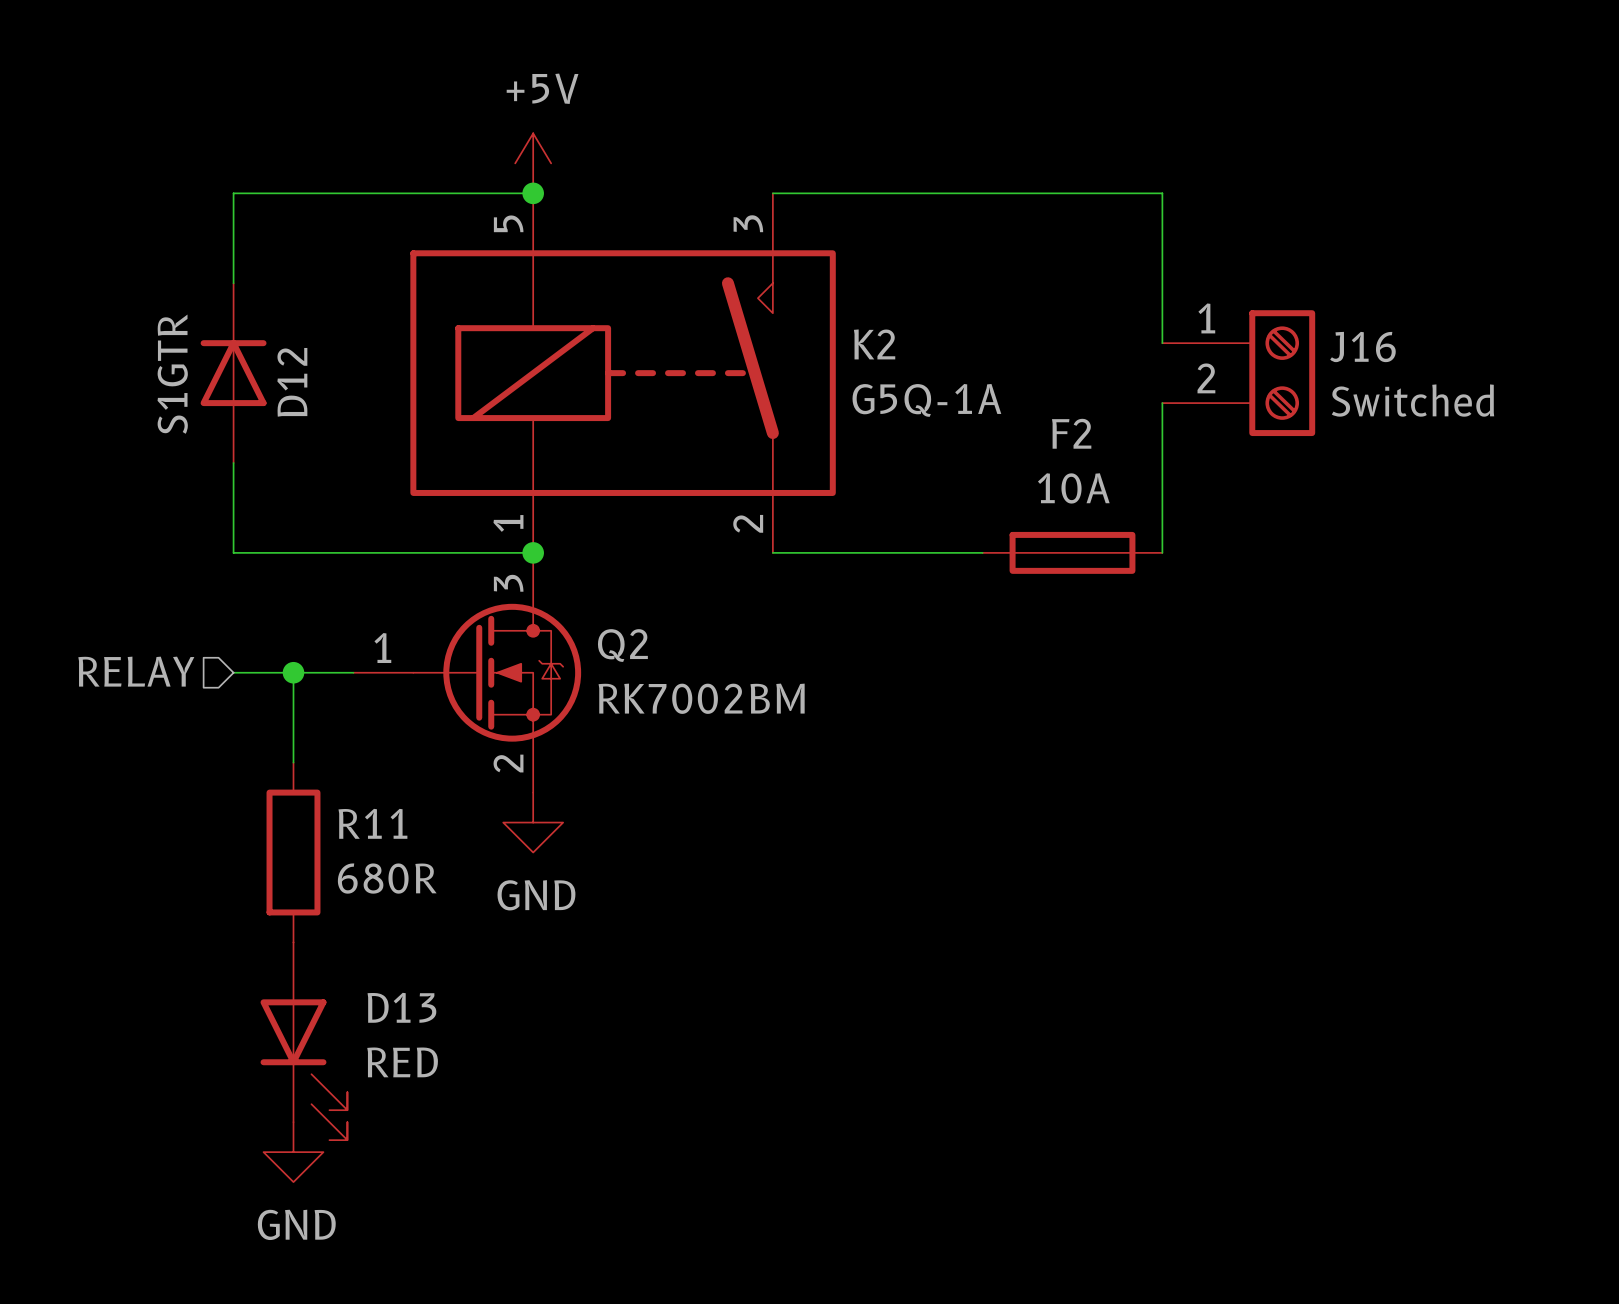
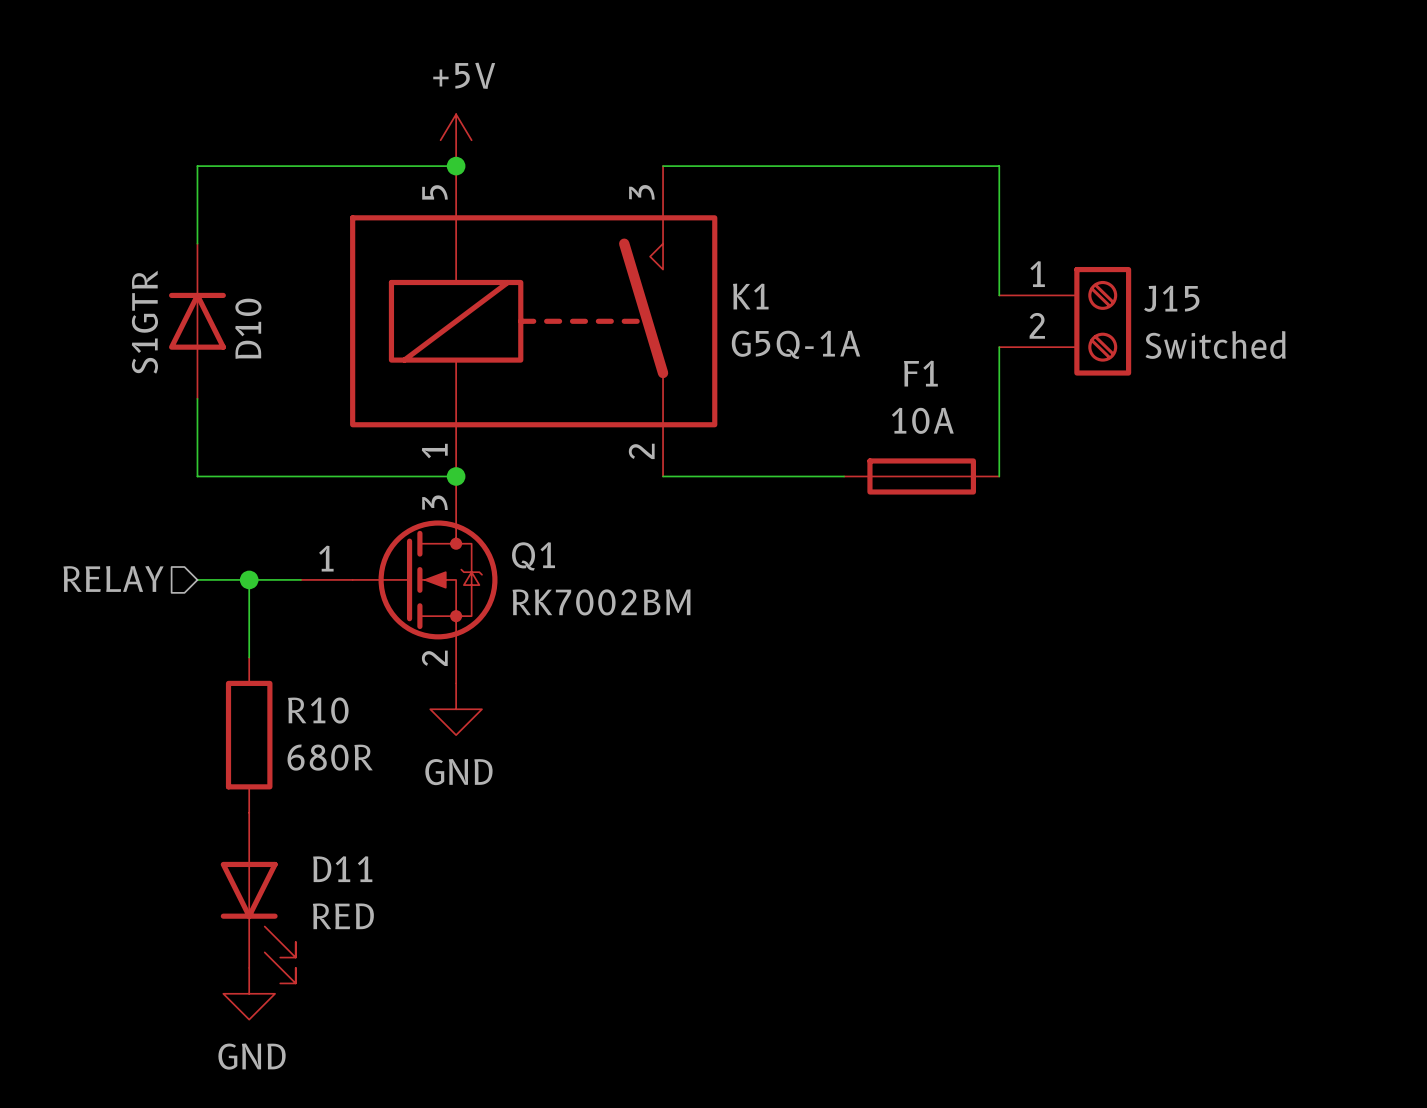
K2 name: K2 (874, 344) -> K1 (750, 296)
J16 name: J16 (1362, 347) -> J15 (1171, 298)
D12 name: D12 (292, 382) -> D10 (248, 328)
F2 name: F2 (1071, 433) -> F1 (920, 373)
Q2 name: Q2 (622, 645) -> Q1 (533, 556)
R11 name: R11 (372, 823) -> R10 (318, 710)
D13 name: D13 (401, 1007) -> D11 (342, 869)

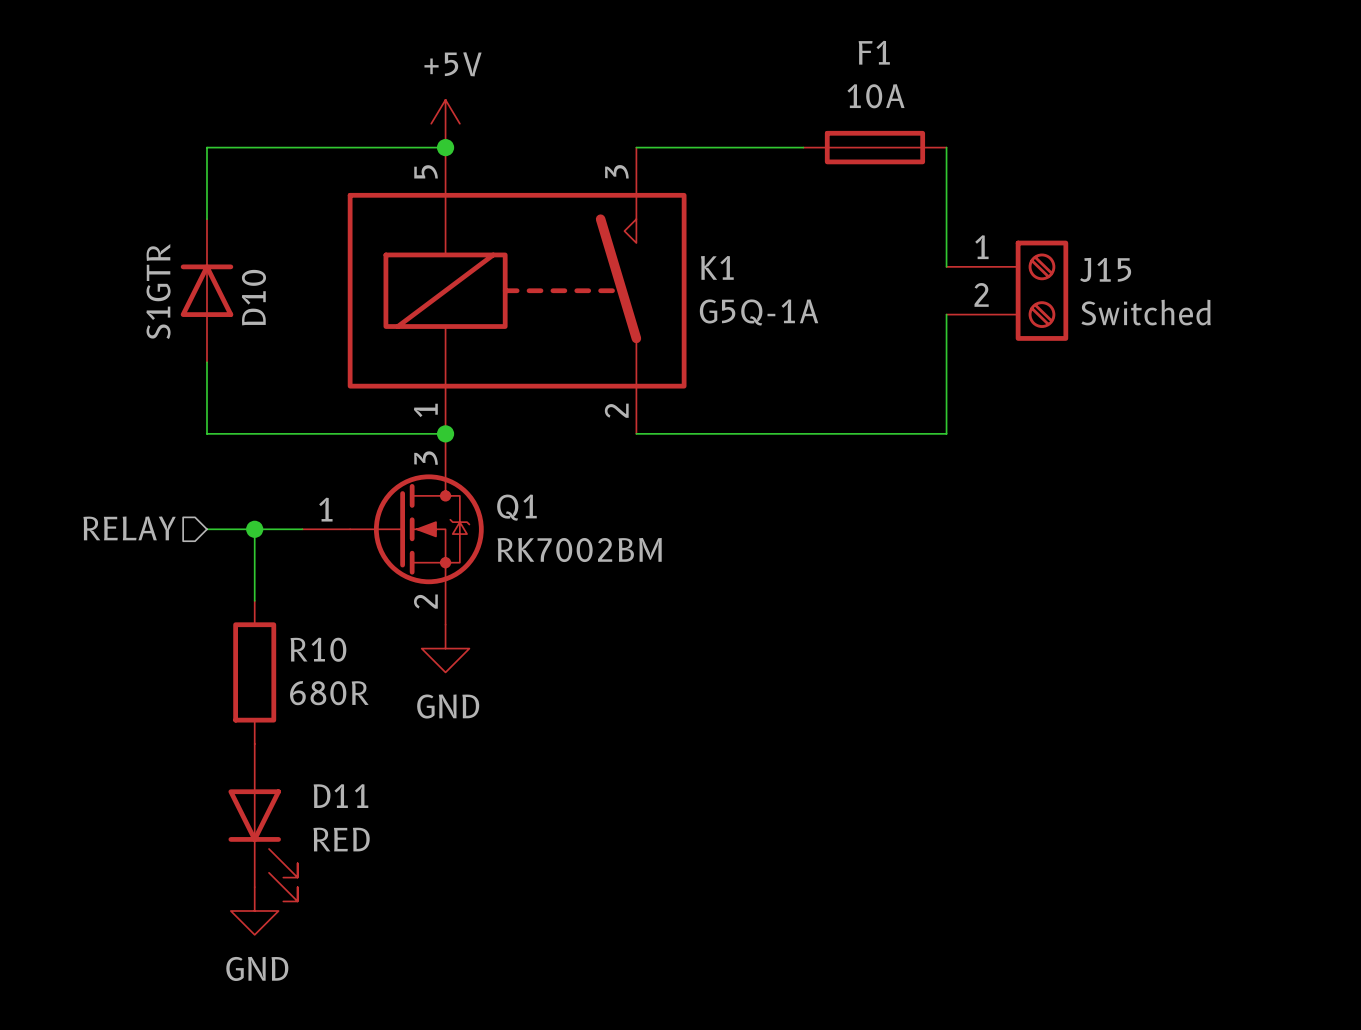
F1 position: (921, 476) -> (874, 147)

